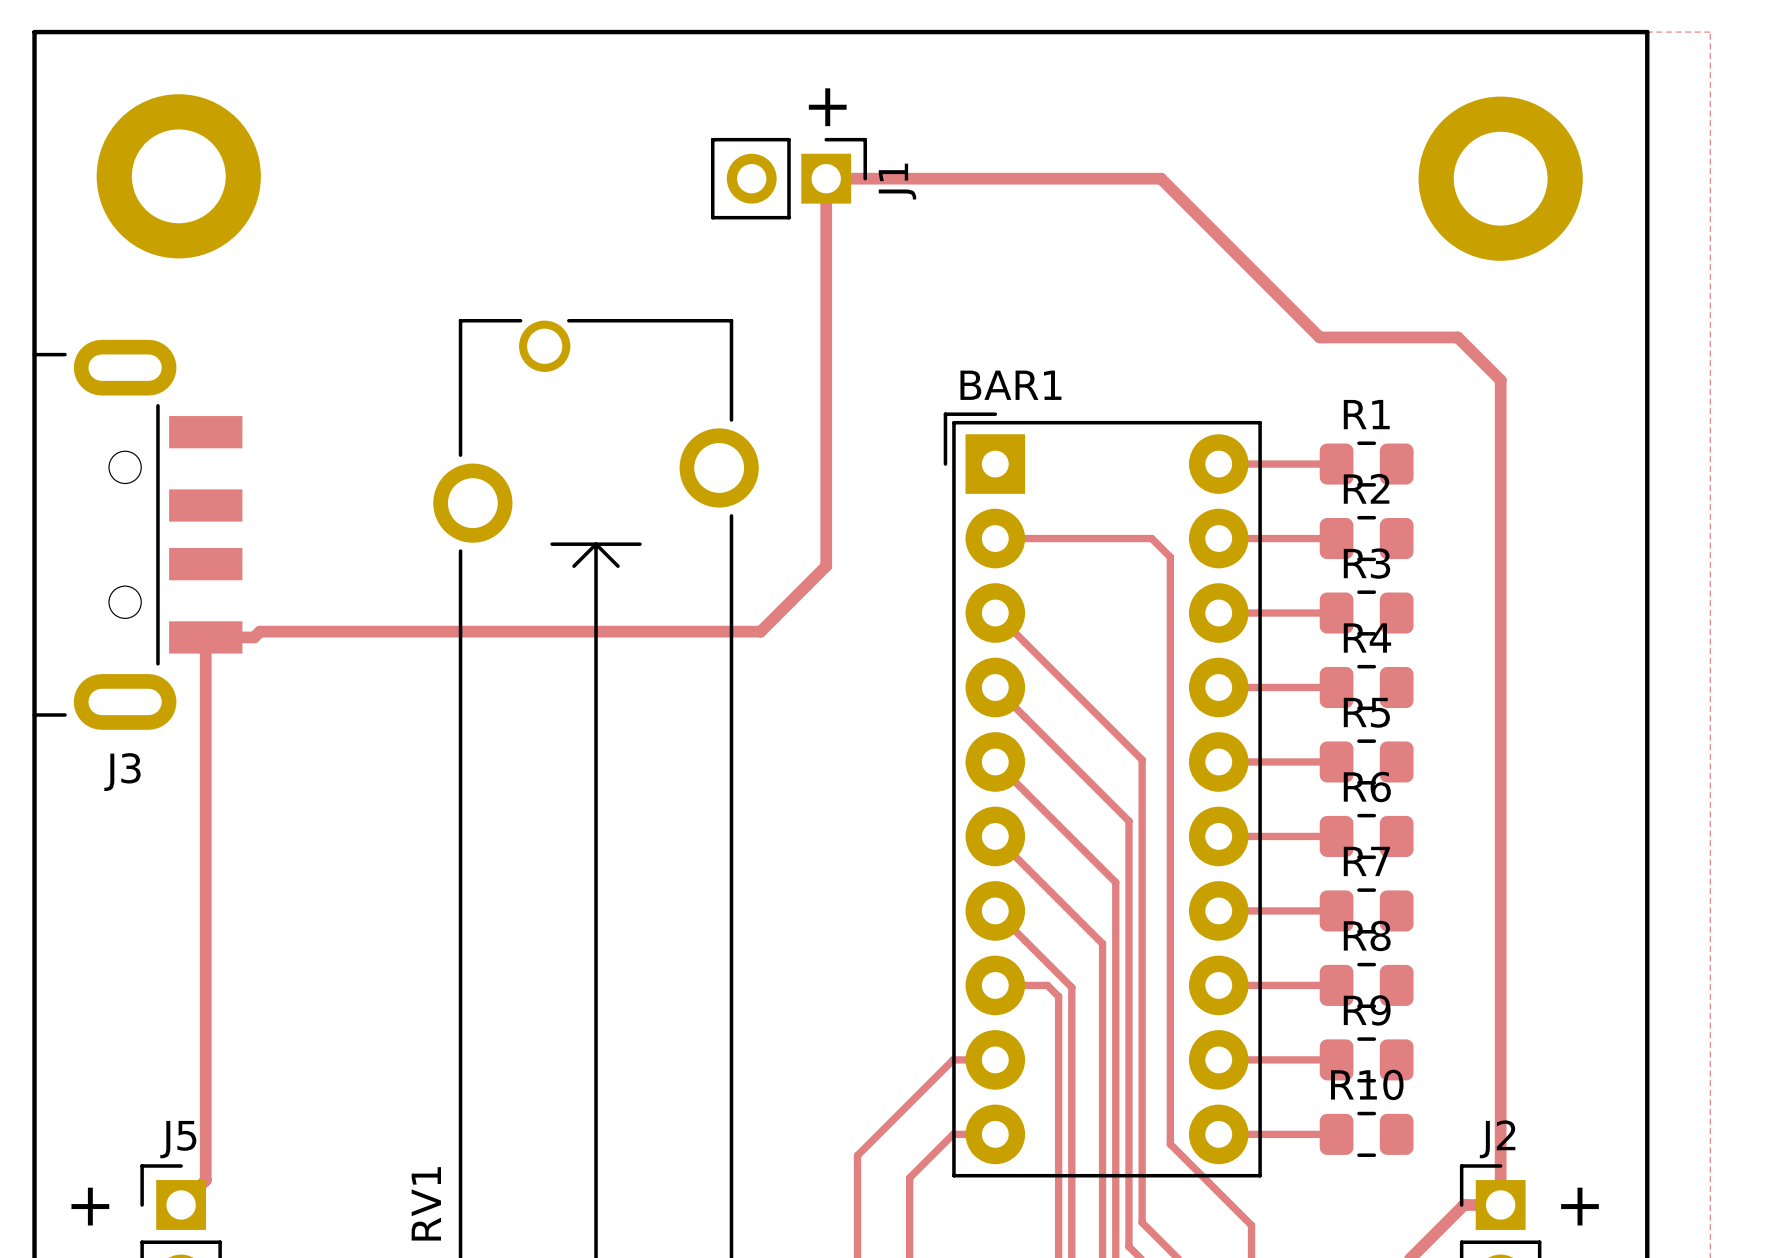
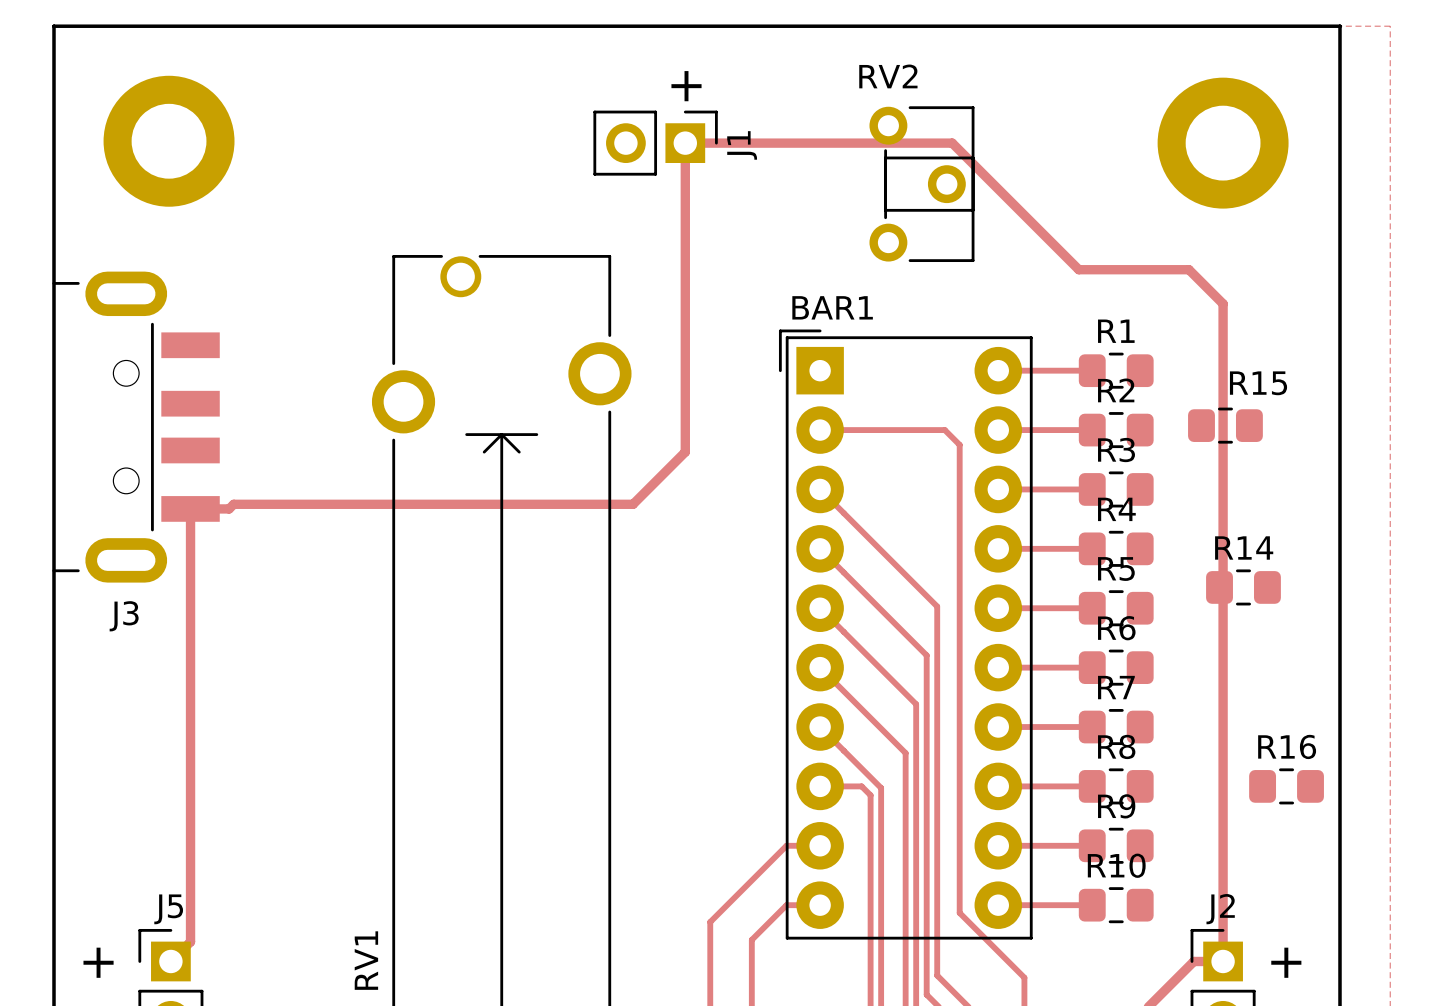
RV2: none -> (921, 184)
R15: none -> (1225, 425)
R14: none -> (1243, 587)
R16: none -> (1286, 786)

